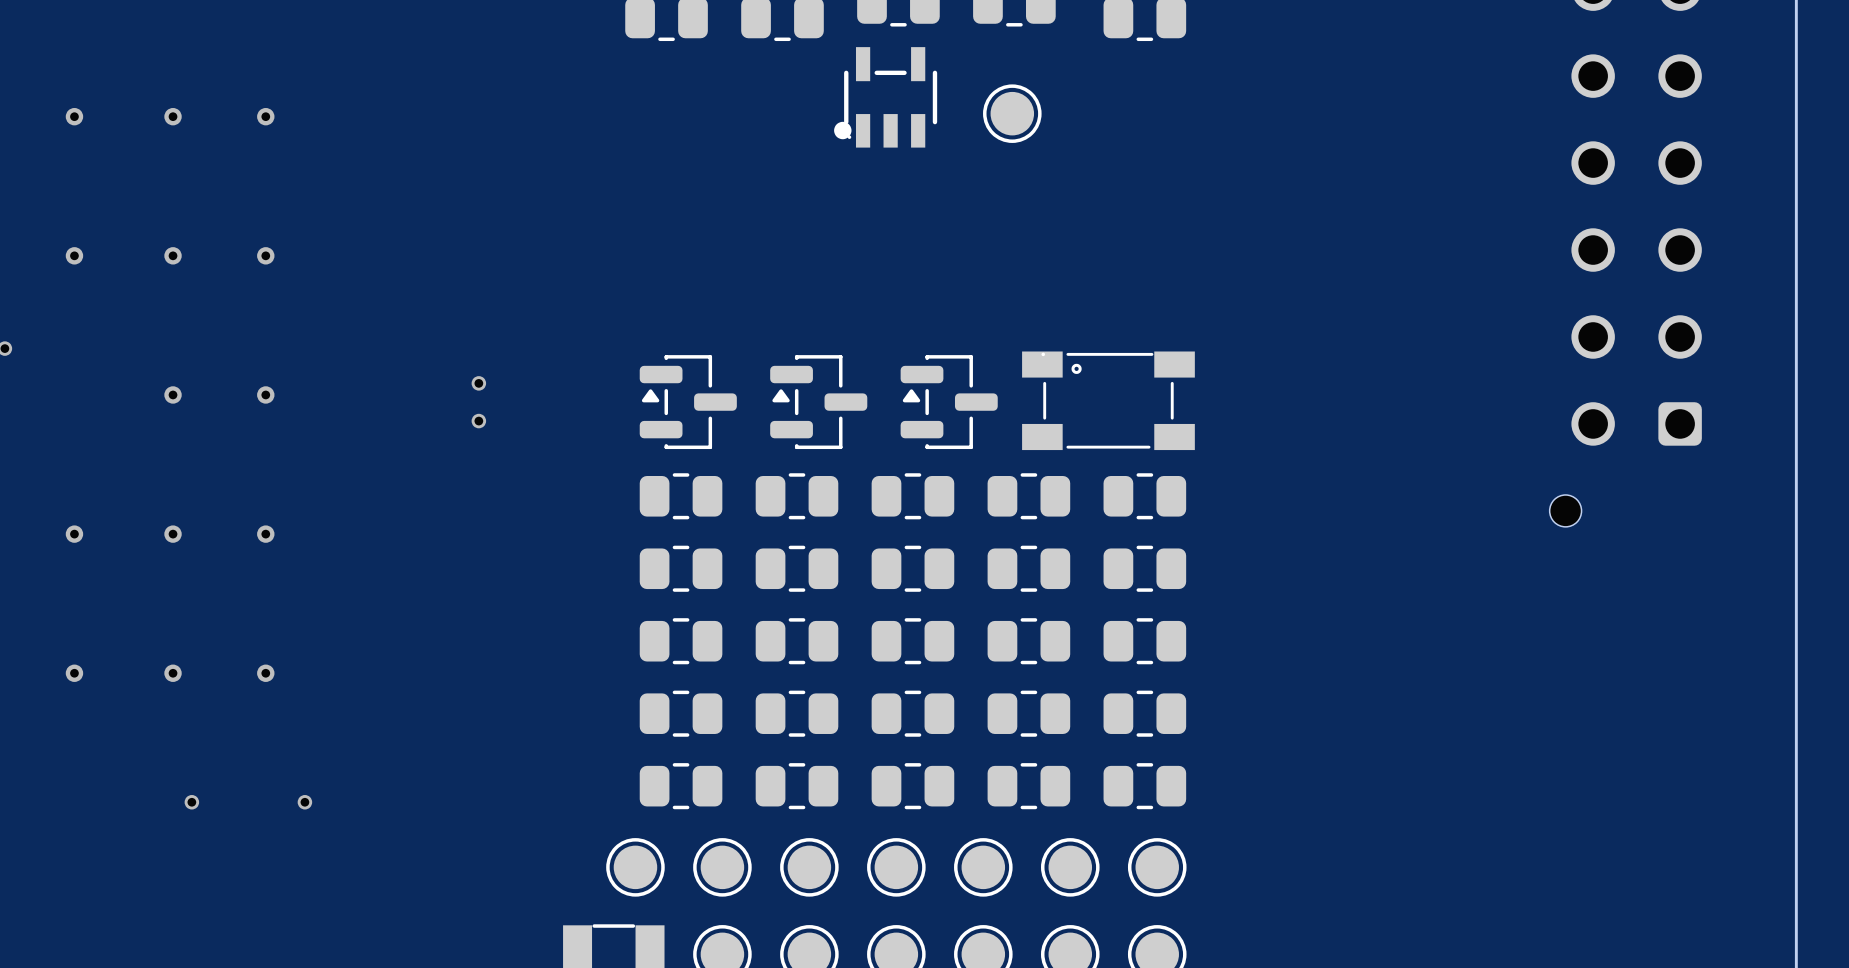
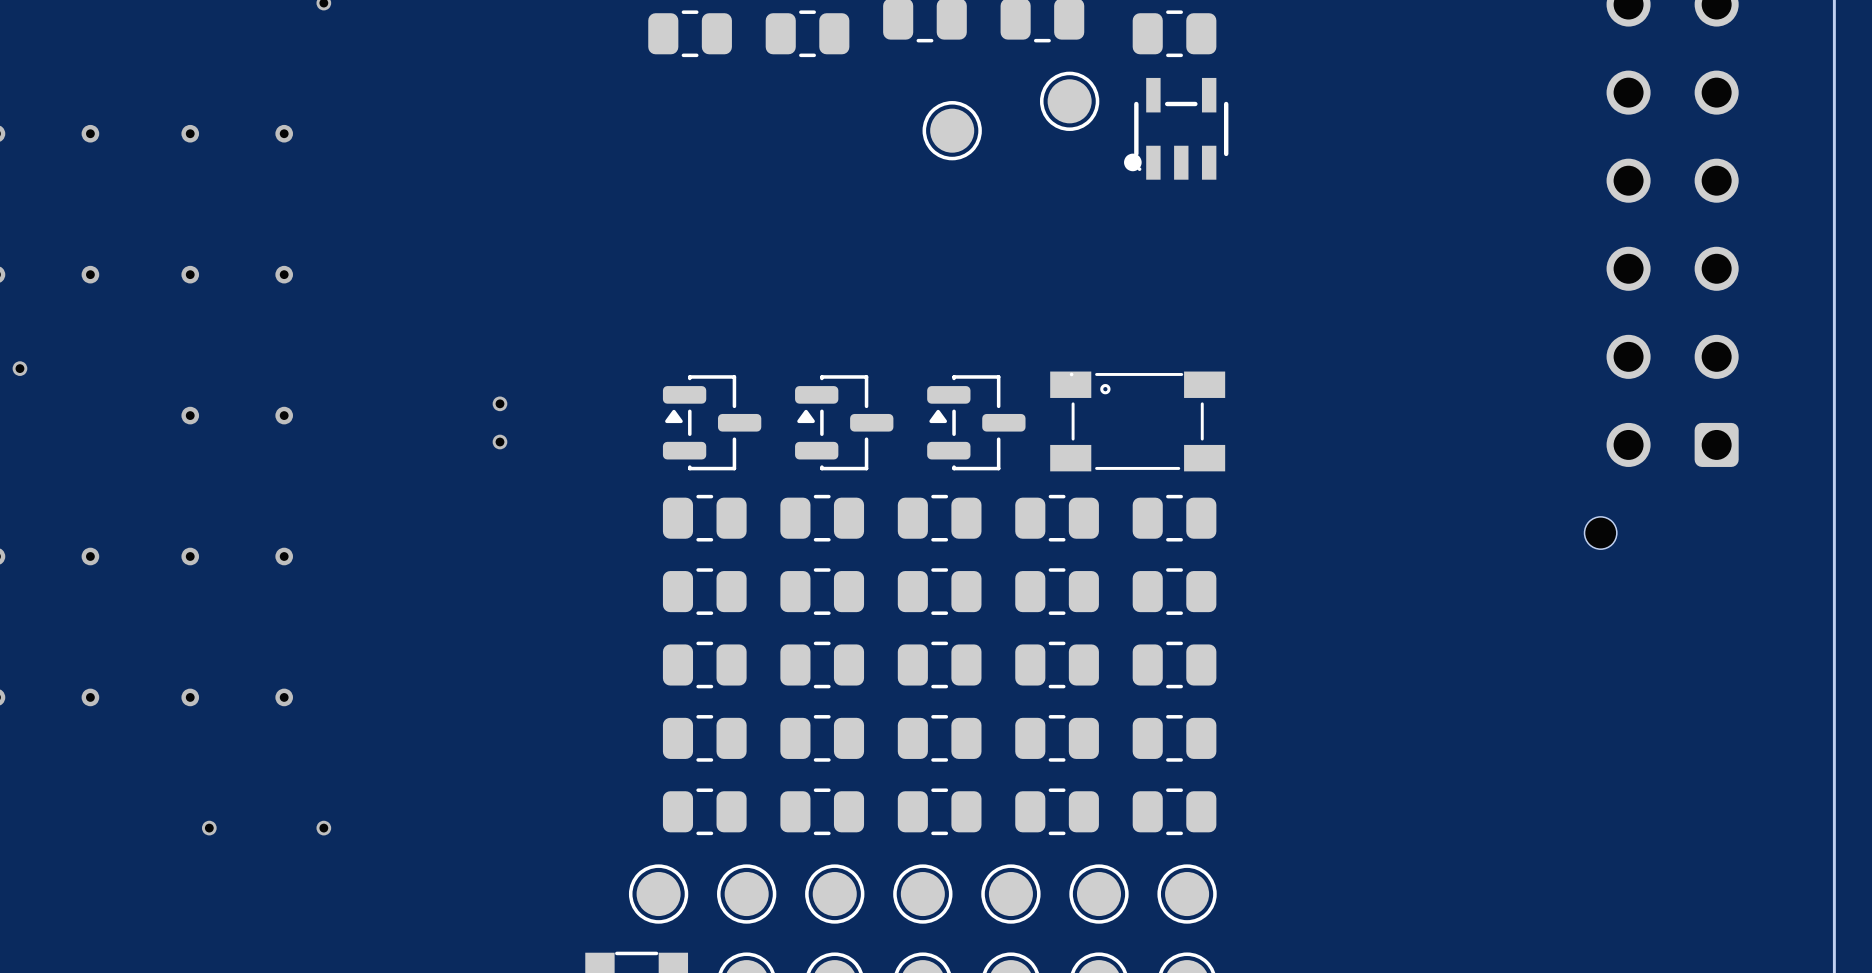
part position: (885, 97) -> (1176, 128)
part: none -> (952, 130)
part position: (1012, 113) -> (1069, 101)

